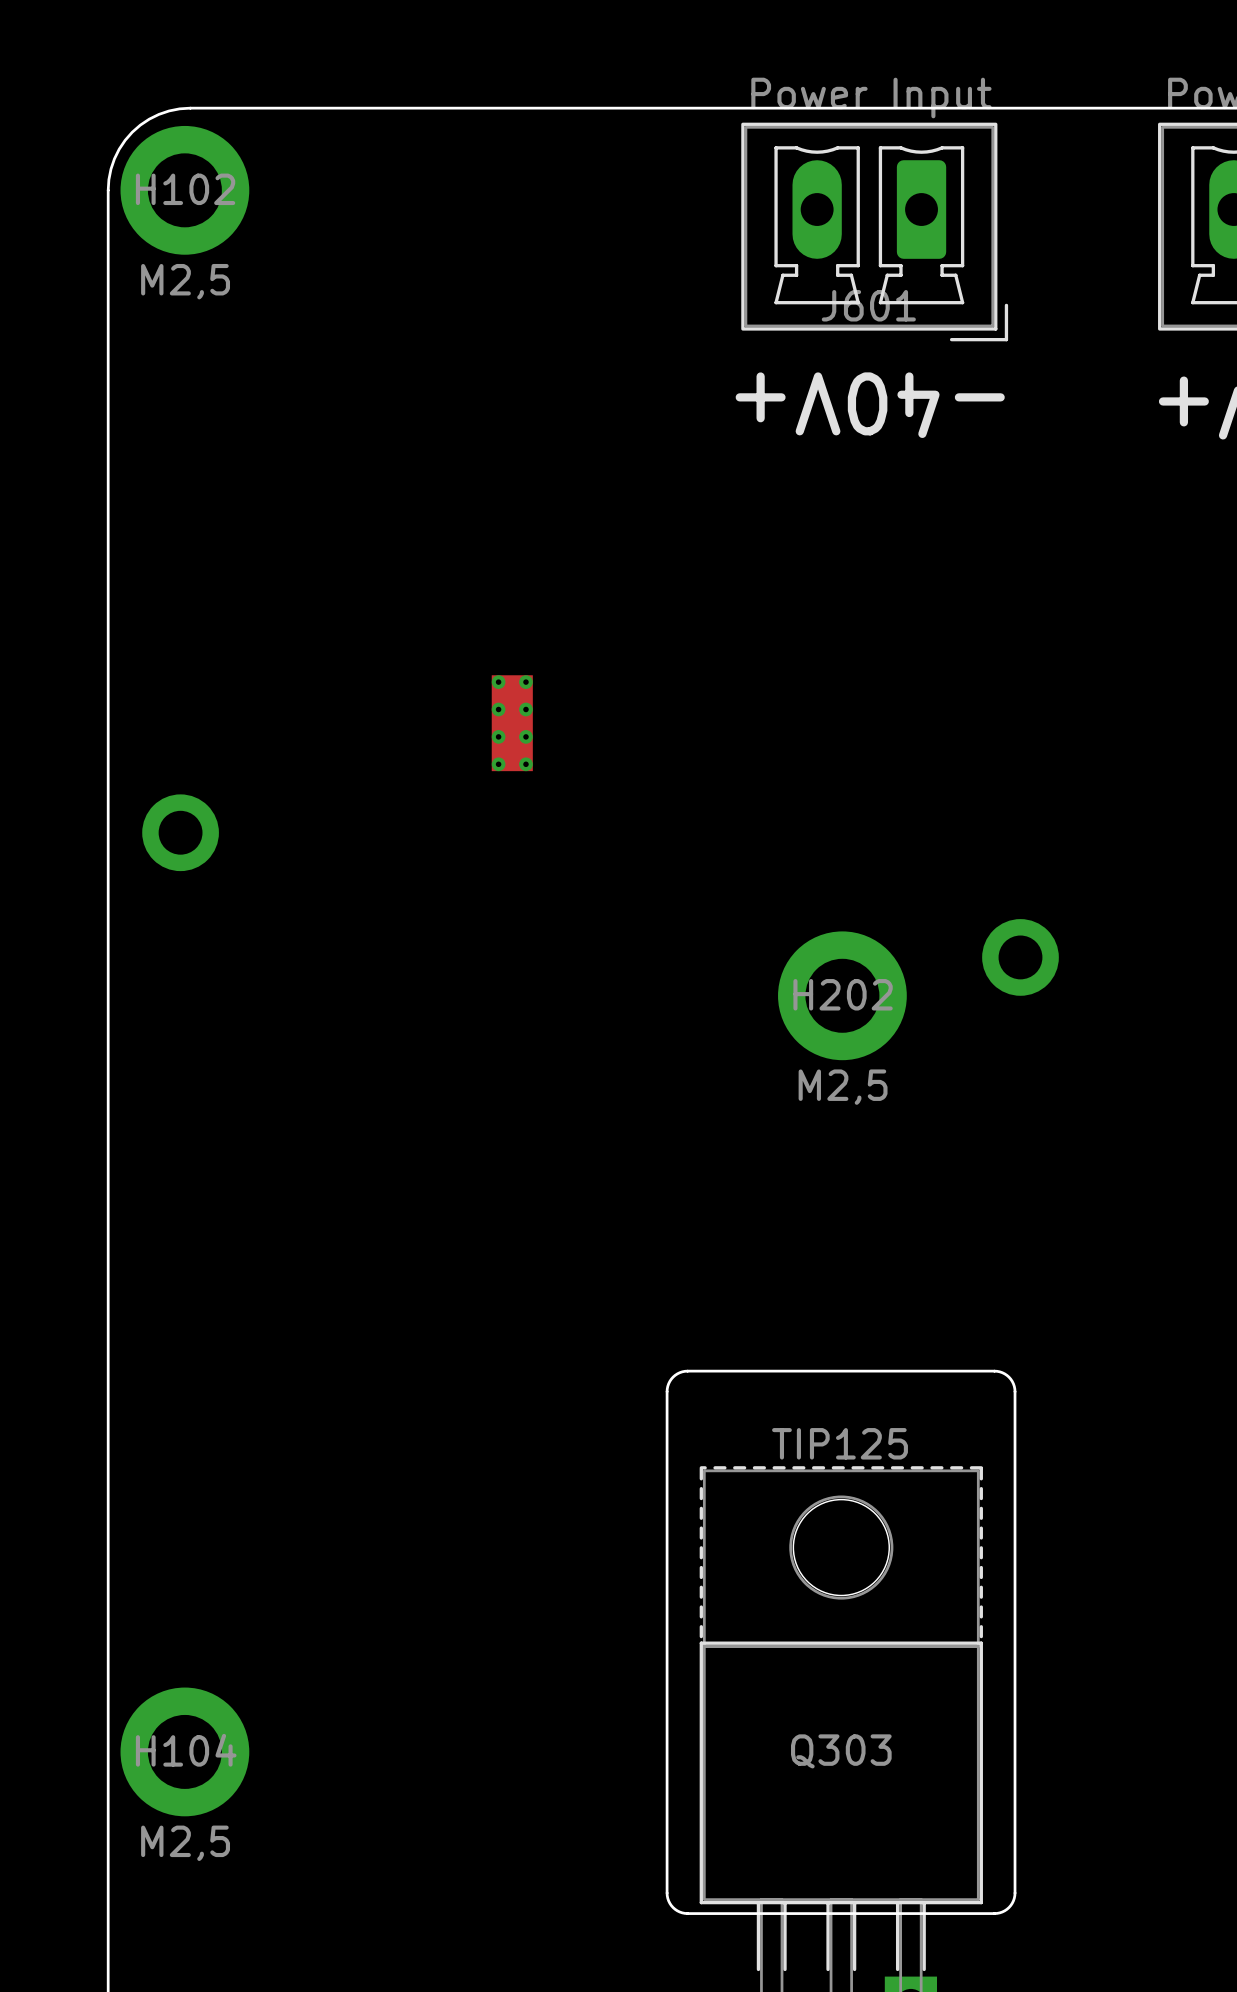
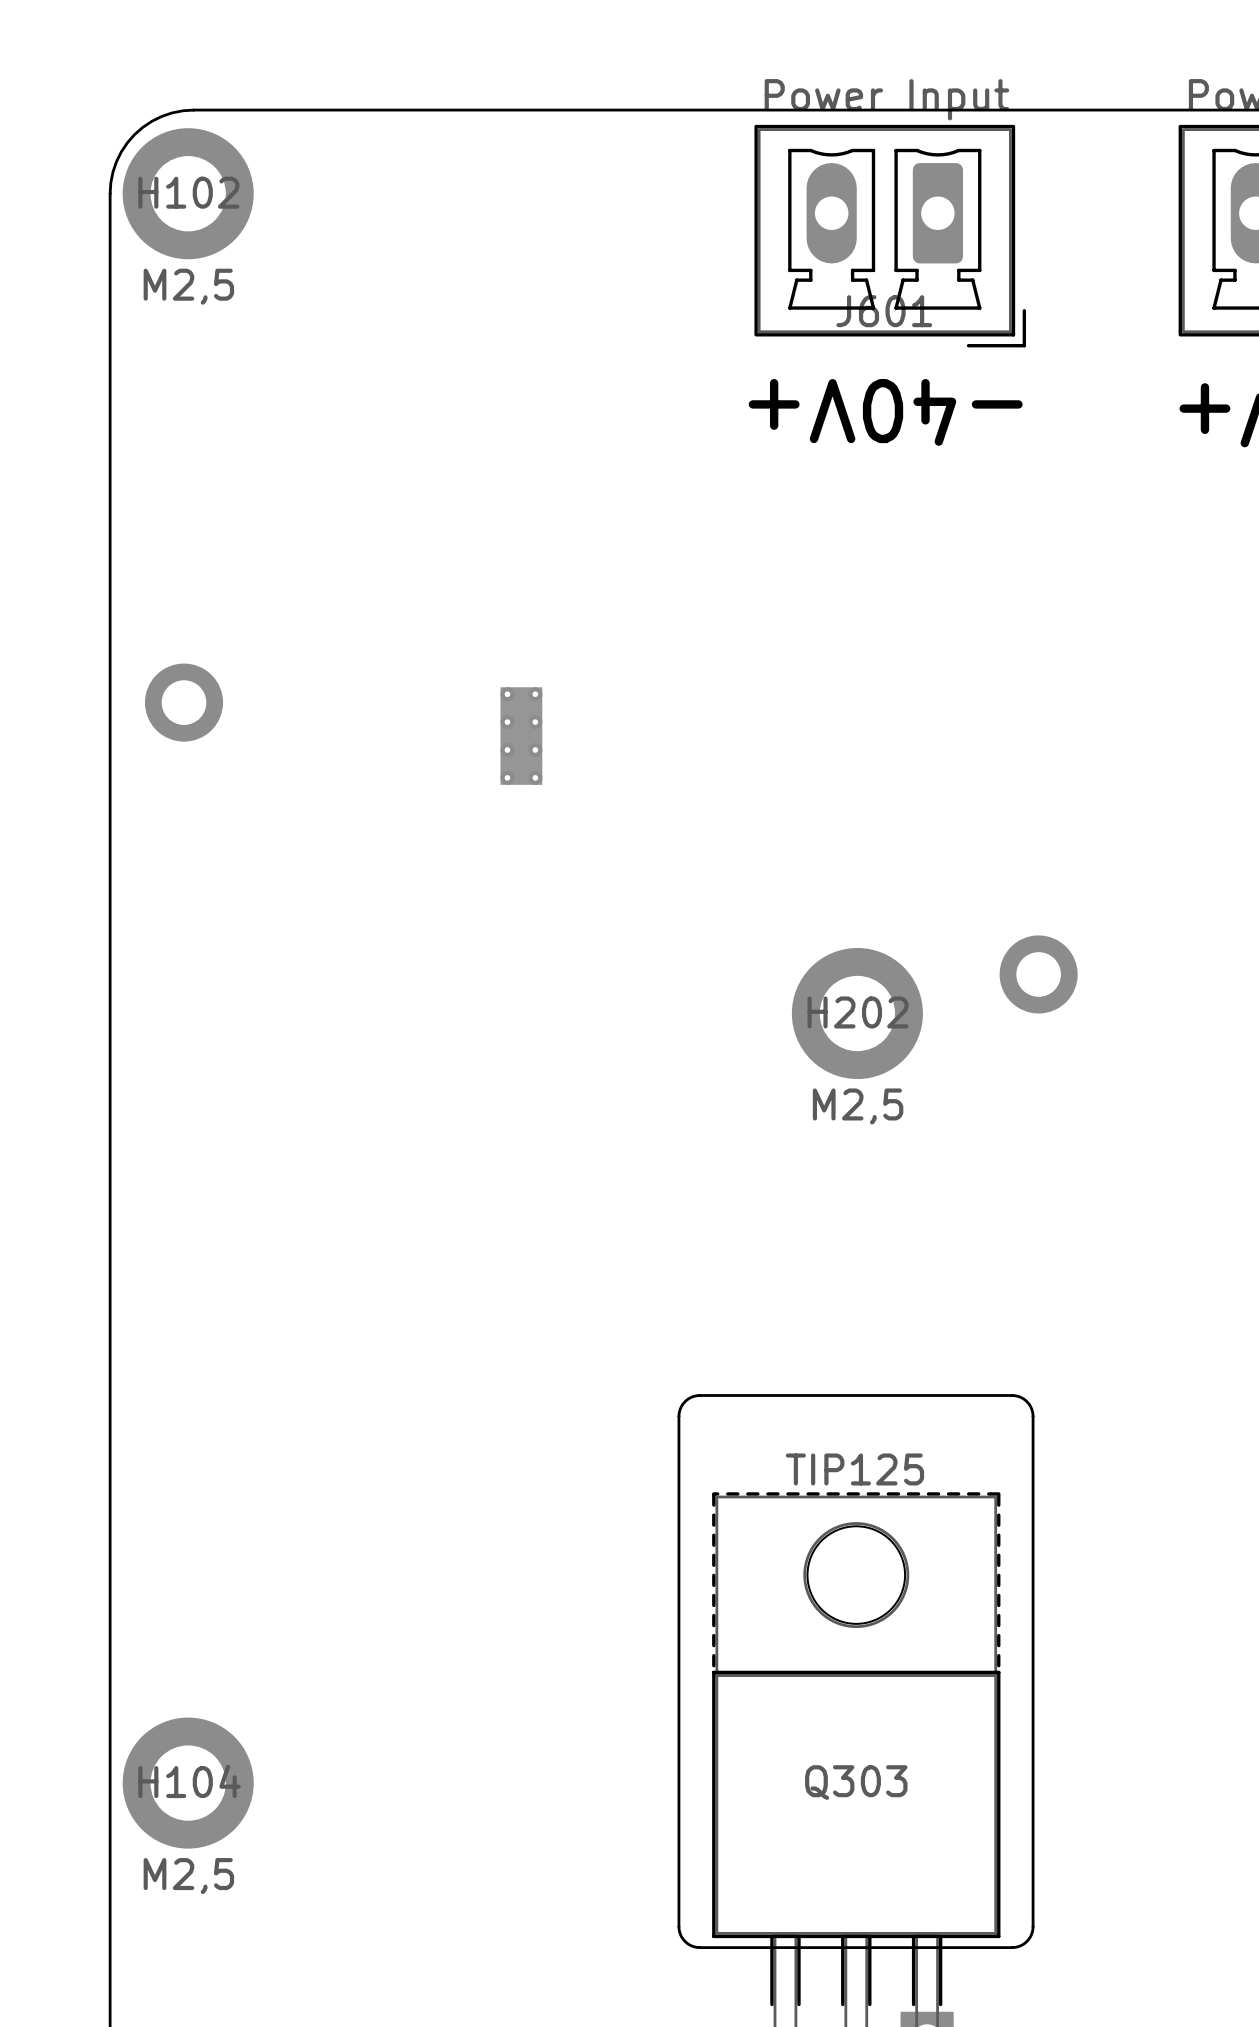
part position: (180, 832) -> (184, 702)

